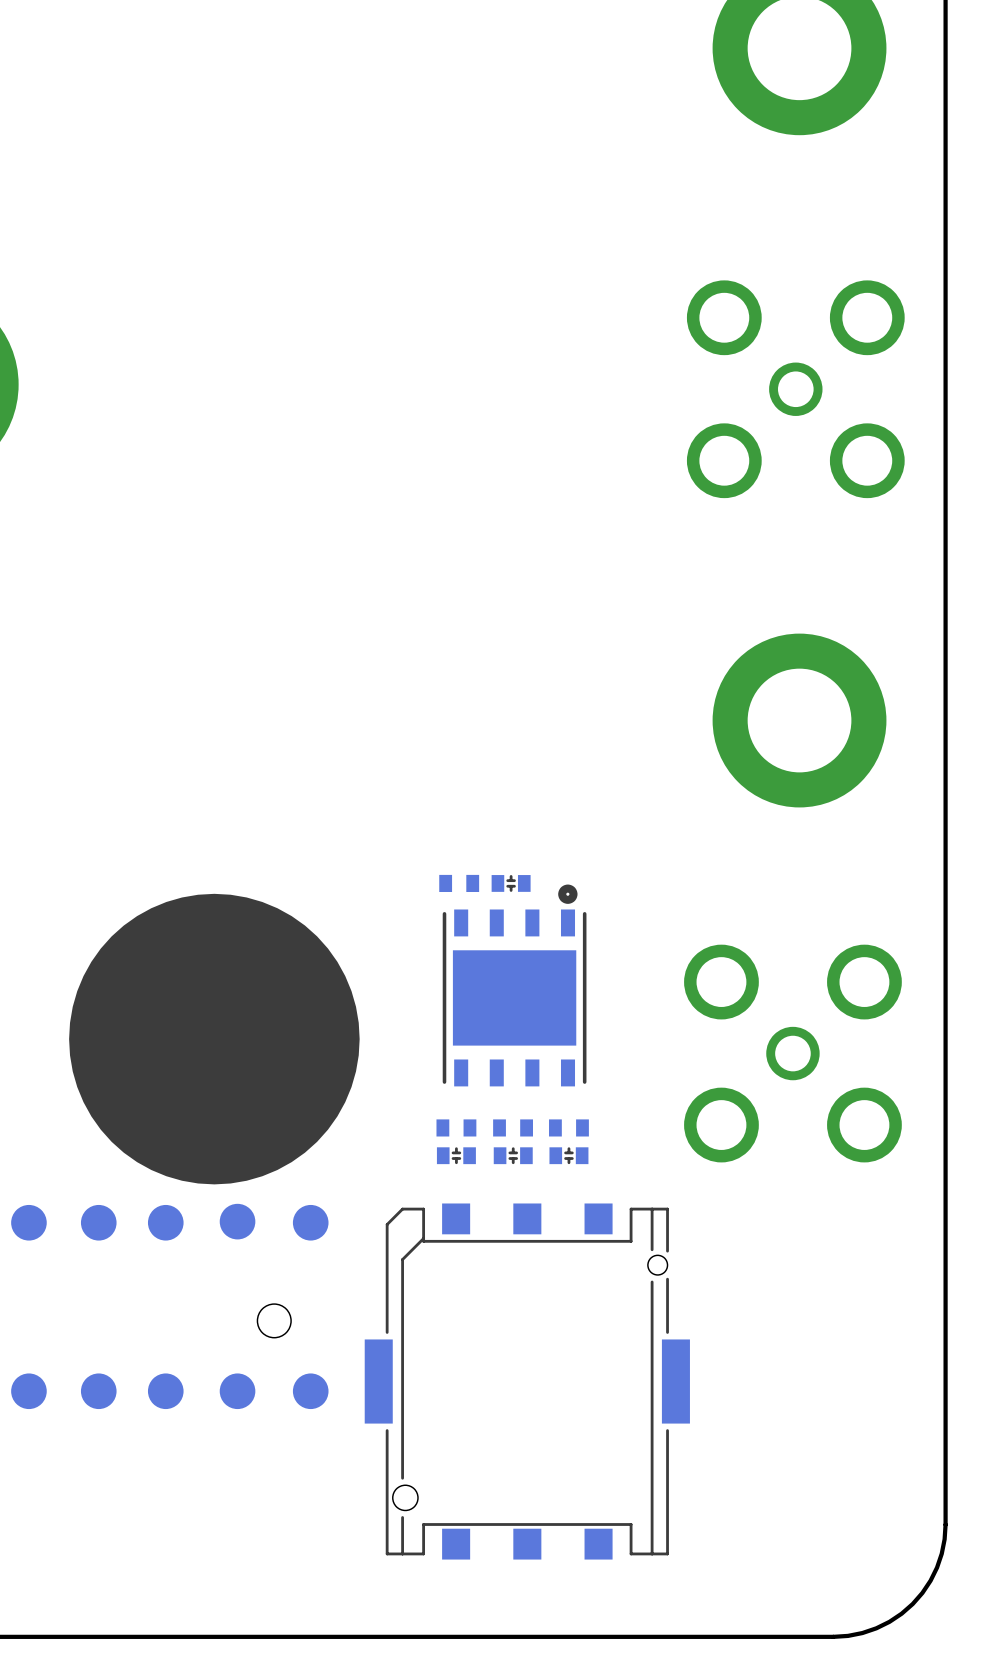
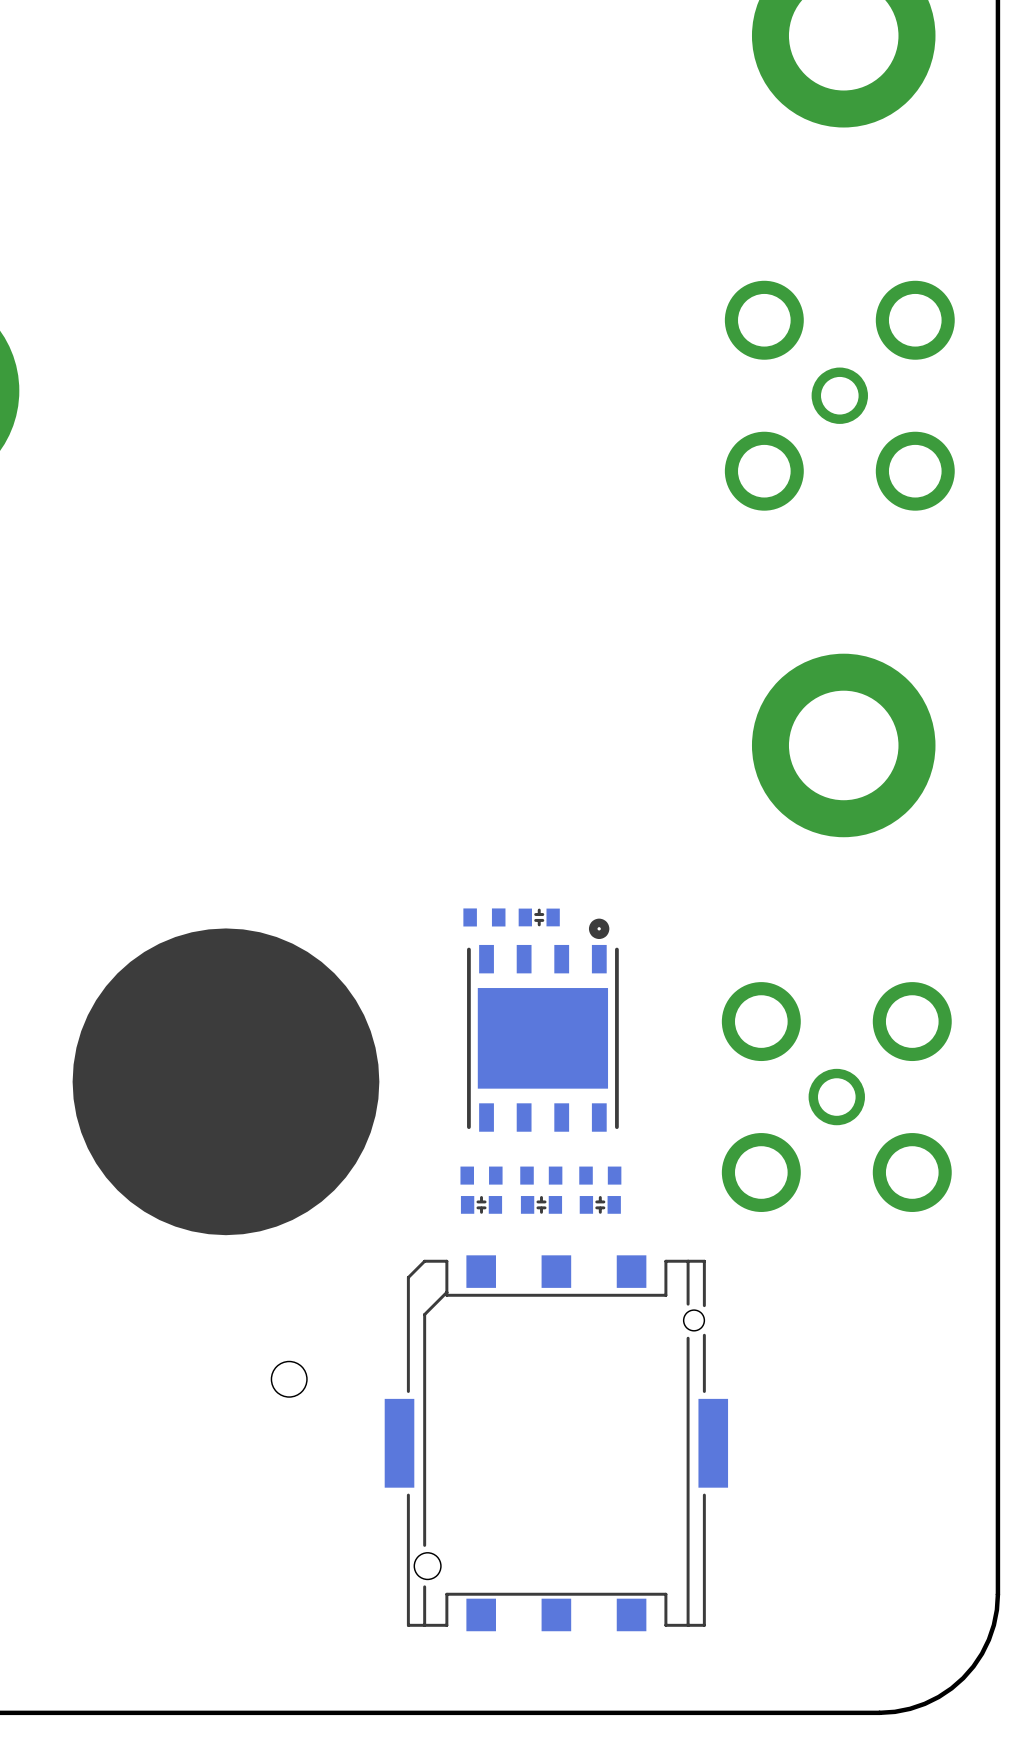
part: (237, 1221) -> none
part: (28, 1222) -> none
part: (98, 1222) -> none
part: (165, 1222) -> none
part: (310, 1222) -> none
part: (28, 1391) -> none
part: (98, 1391) -> none
part: (165, 1391) -> none
part: (237, 1391) -> none
part: (310, 1391) -> none

